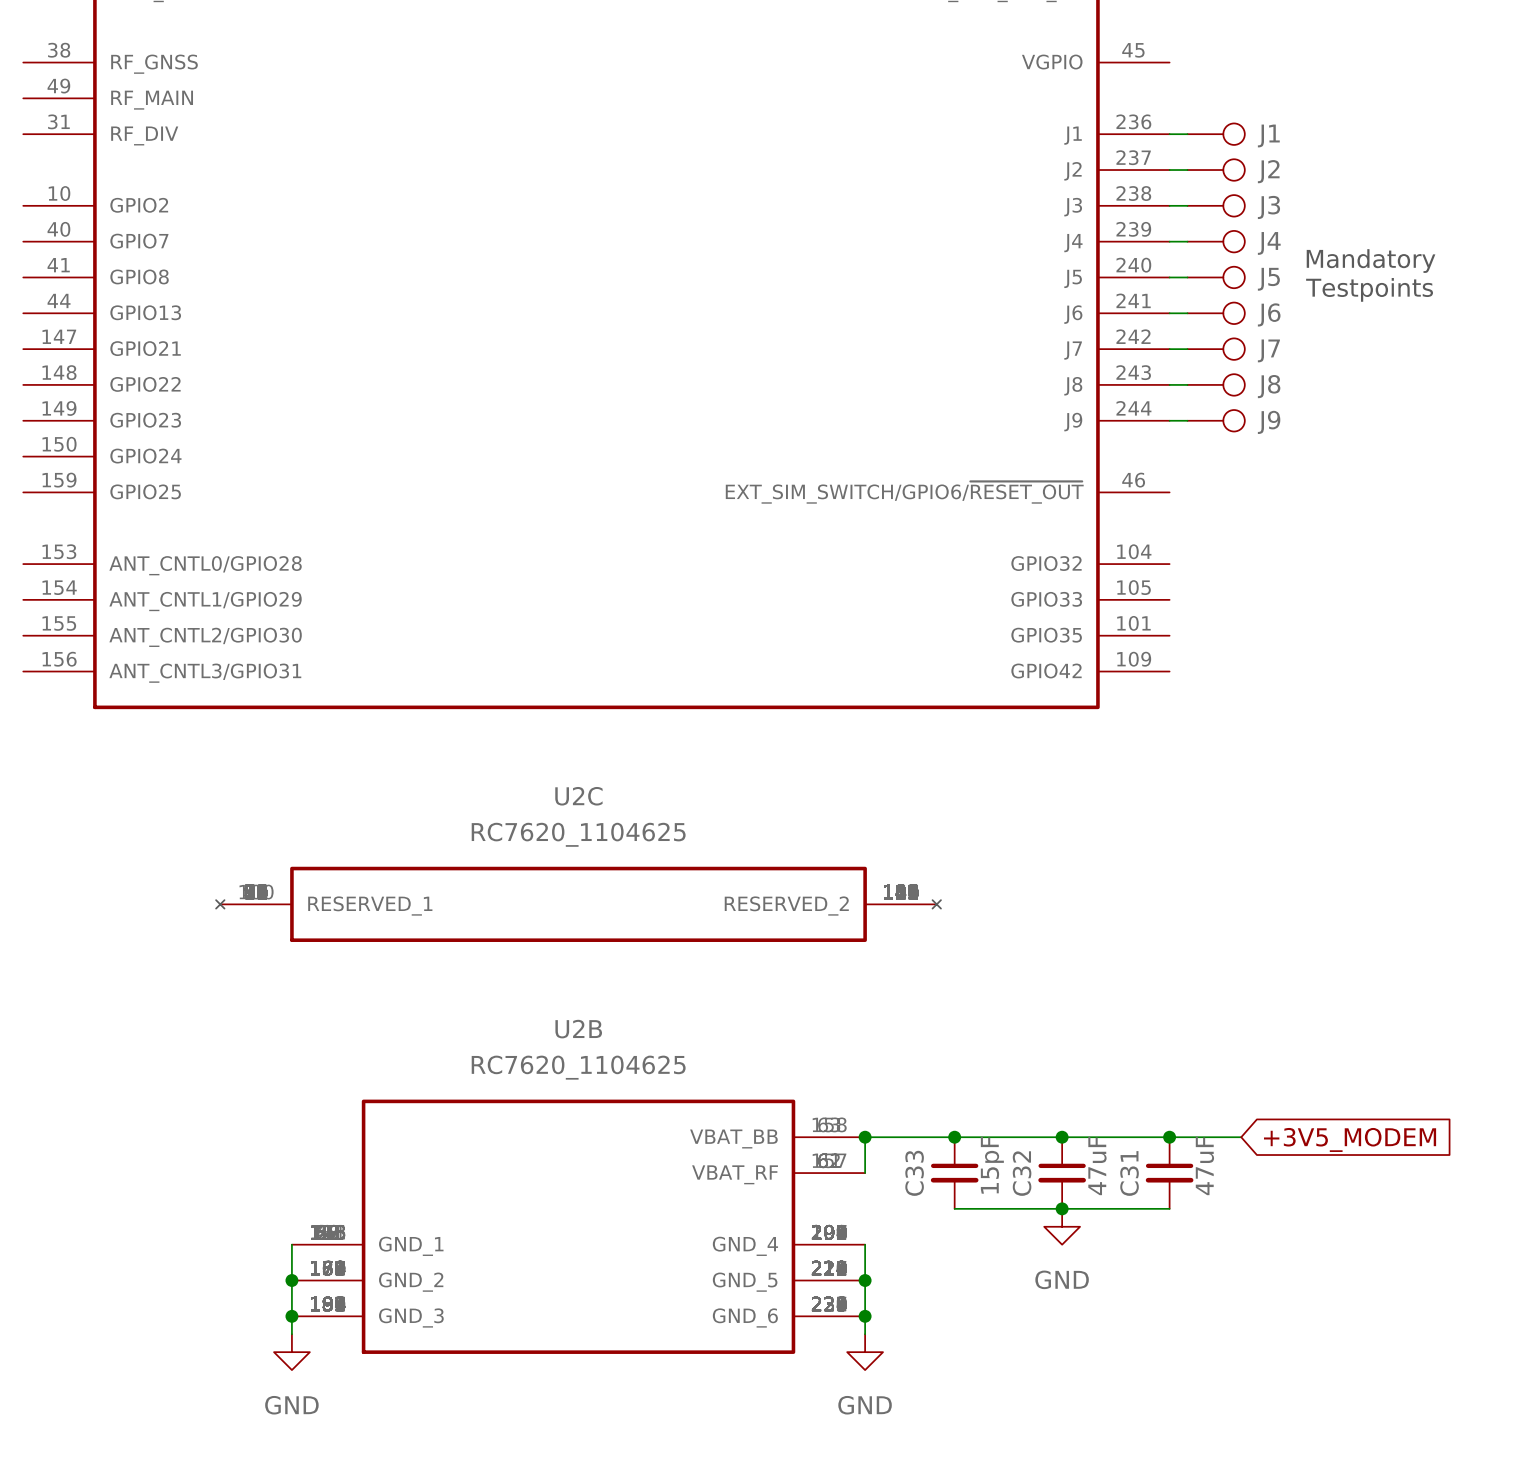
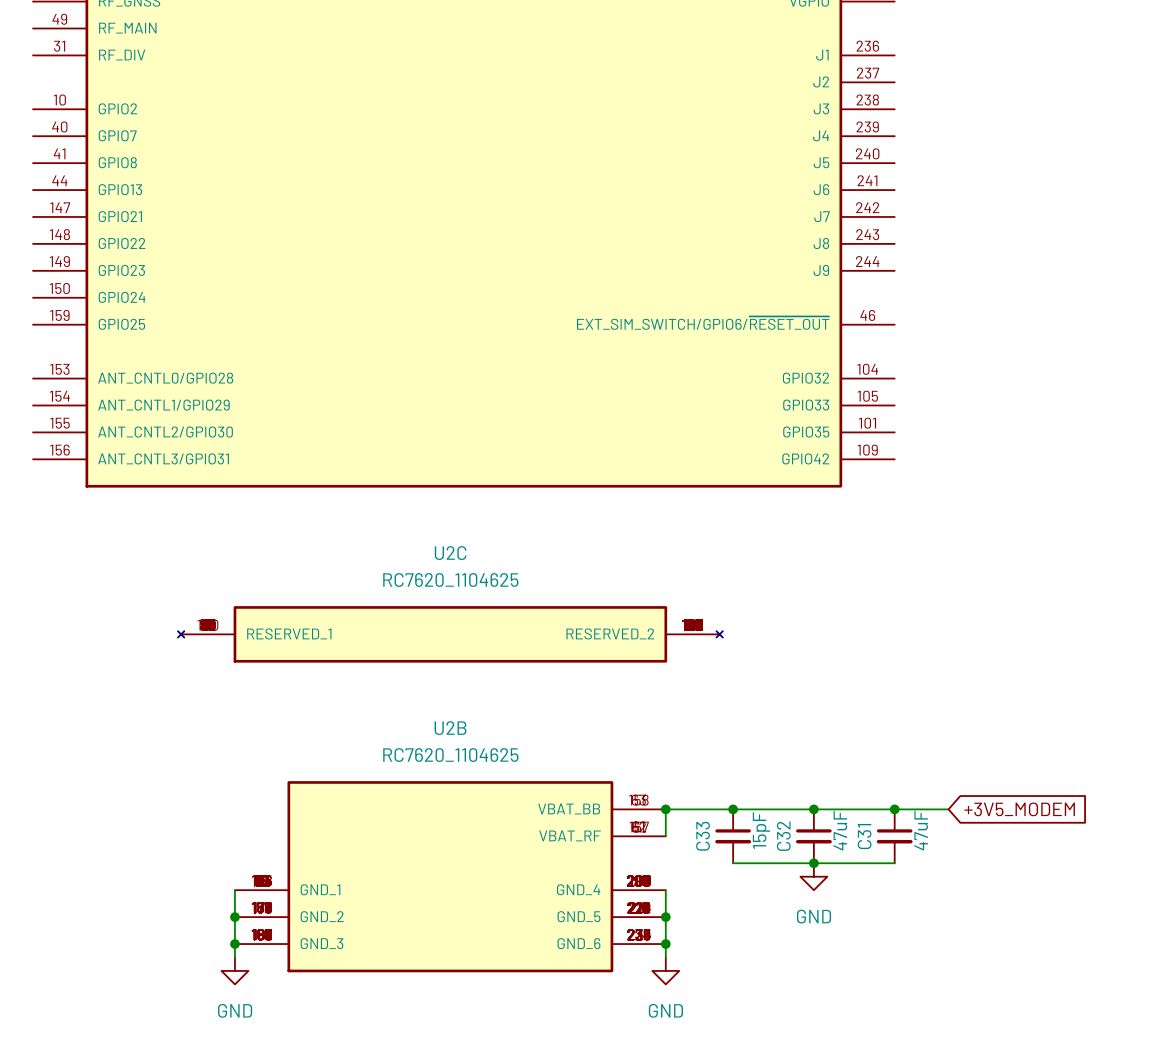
wire: (1169, 134) (1187, 134) -> none
J1: (1216, 134) -> none
wire: (1169, 170) (1187, 170) -> none
J2: (1216, 170) -> none
wire: (1169, 205) (1187, 205) -> none
J3: (1216, 205) -> none
wire: (1169, 241) (1187, 241) -> none
J4: (1216, 241) -> none
text: Mandatory (1371, 261) -> none
wire: (1169, 277) (1187, 277) -> none
J5: (1216, 277) -> none
text: Testpoints (1369, 289) -> none
wire: (1169, 313) (1187, 313) -> none
J6: (1216, 313) -> none
wire: (1169, 349) (1187, 349) -> none
J7: (1216, 349) -> none
wire: (1169, 384) (1187, 384) -> none
J8: (1216, 384) -> none
wire: (1169, 420) (1187, 420) -> none
J9: (1216, 420) -> none

